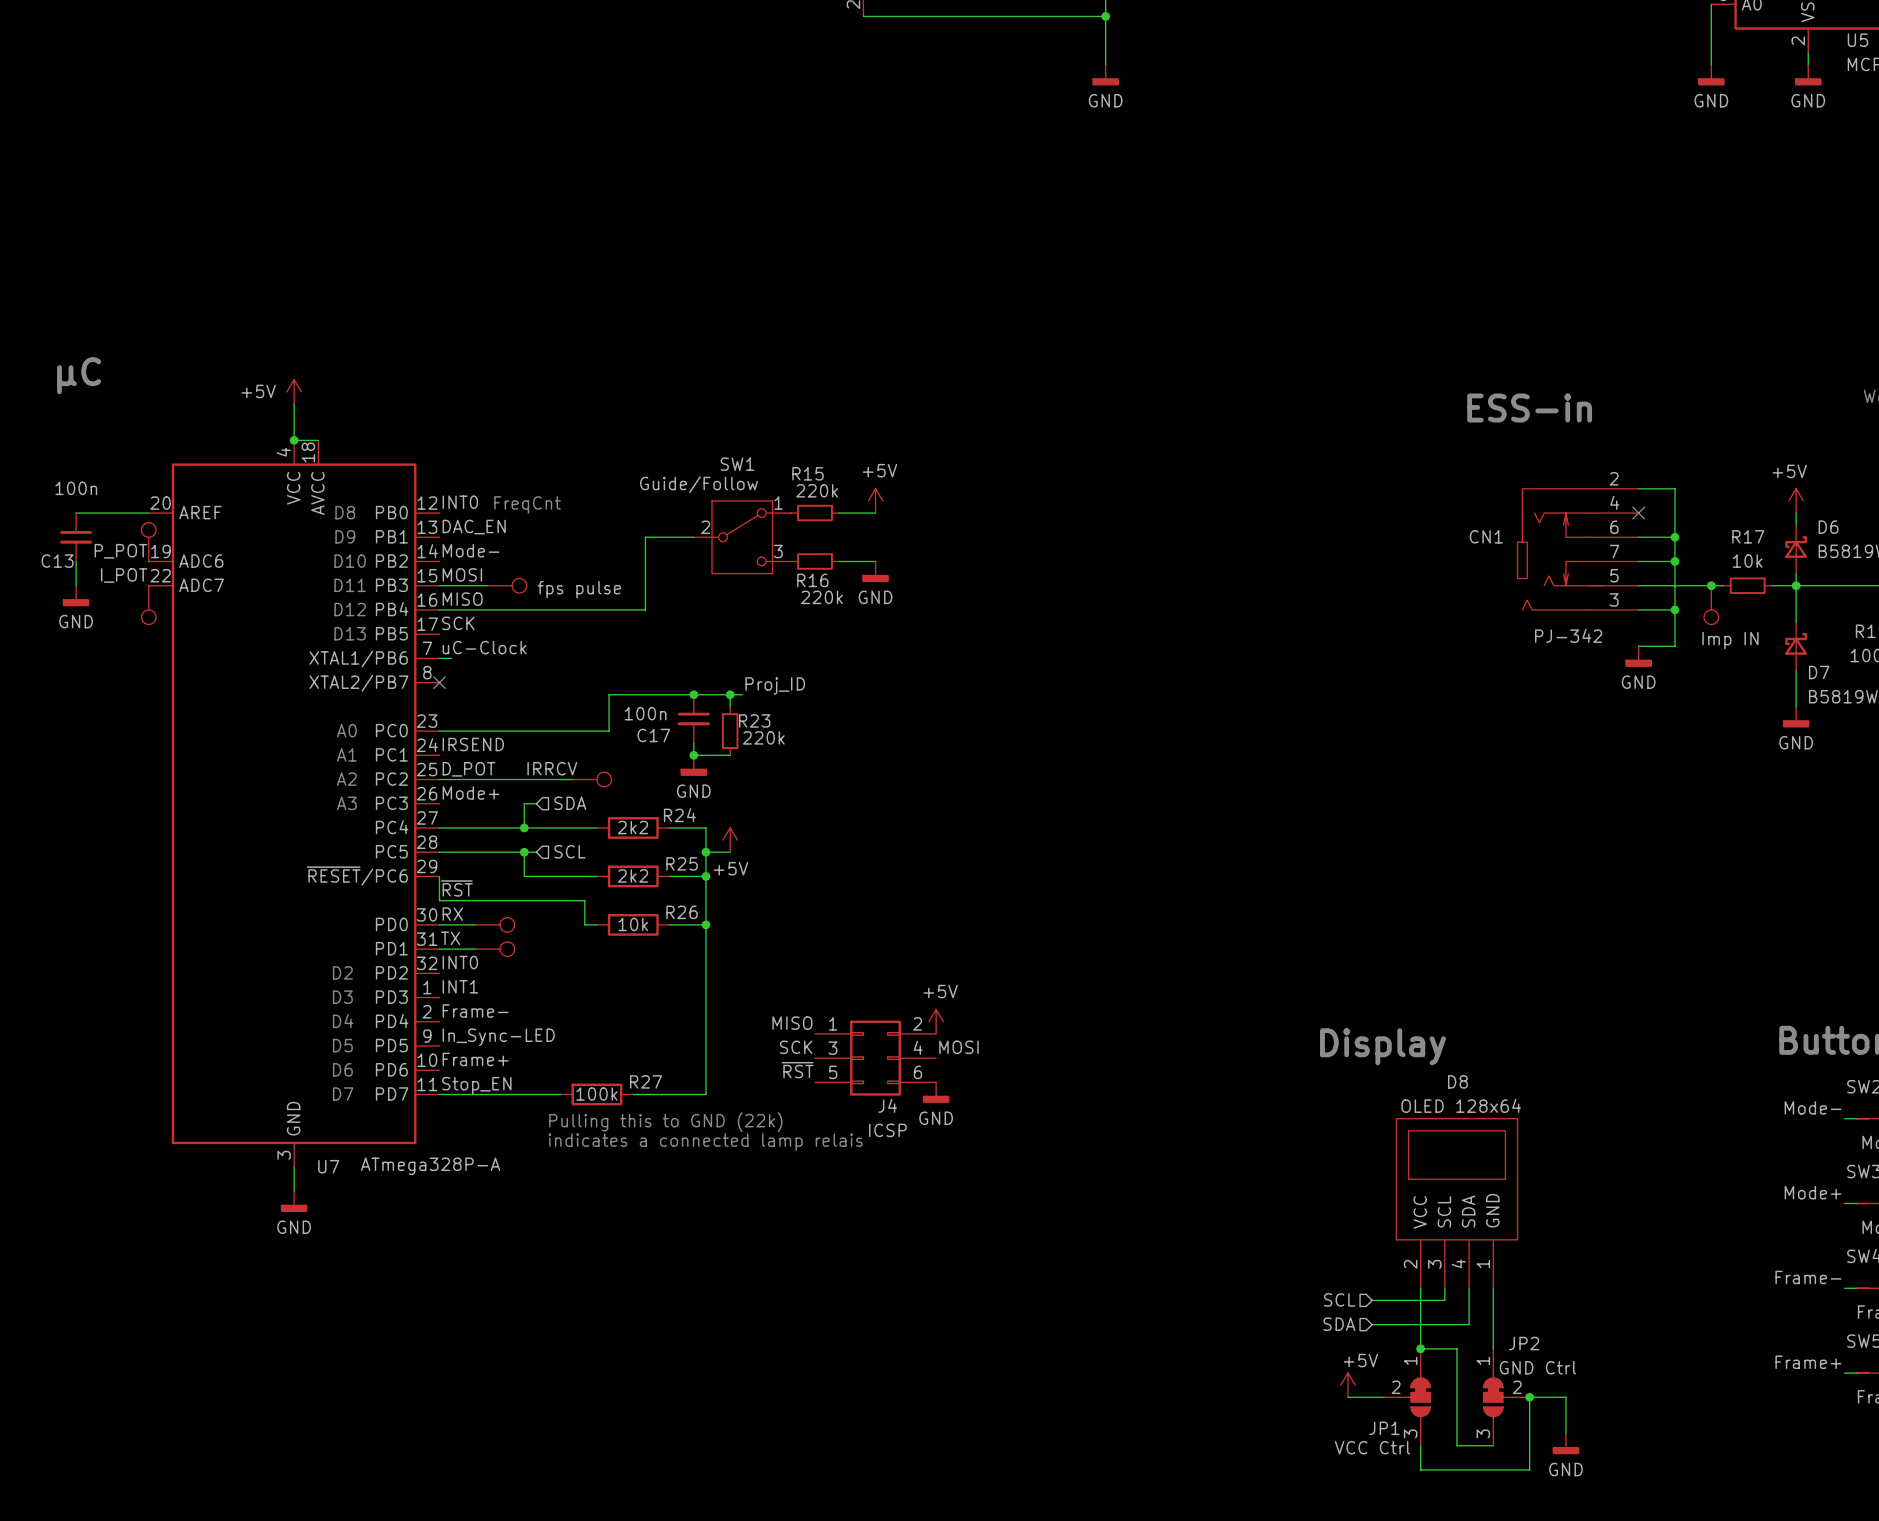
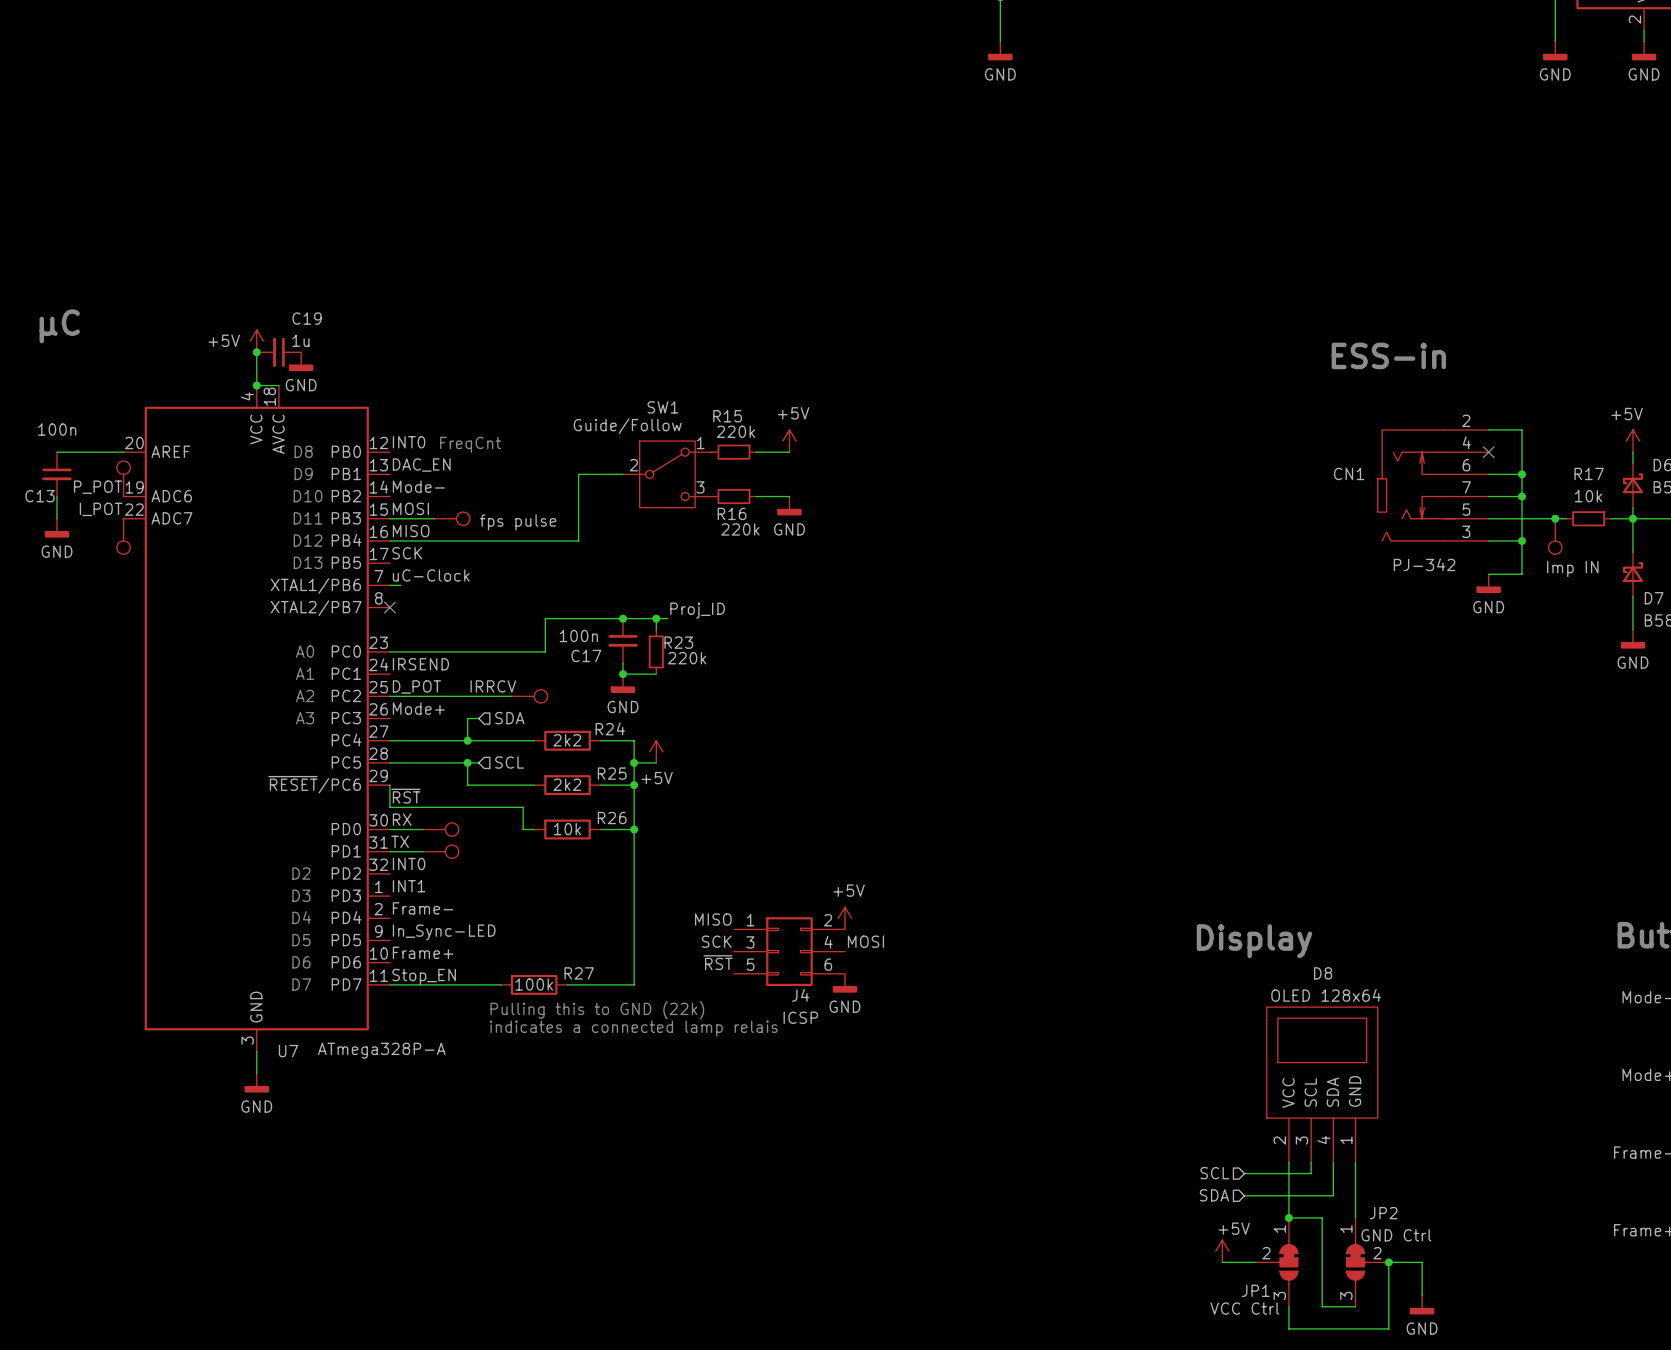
junction: none -> (256, 352)
C19: none -> 1u (278, 352)
power symbol: none -> GND (301, 361)

